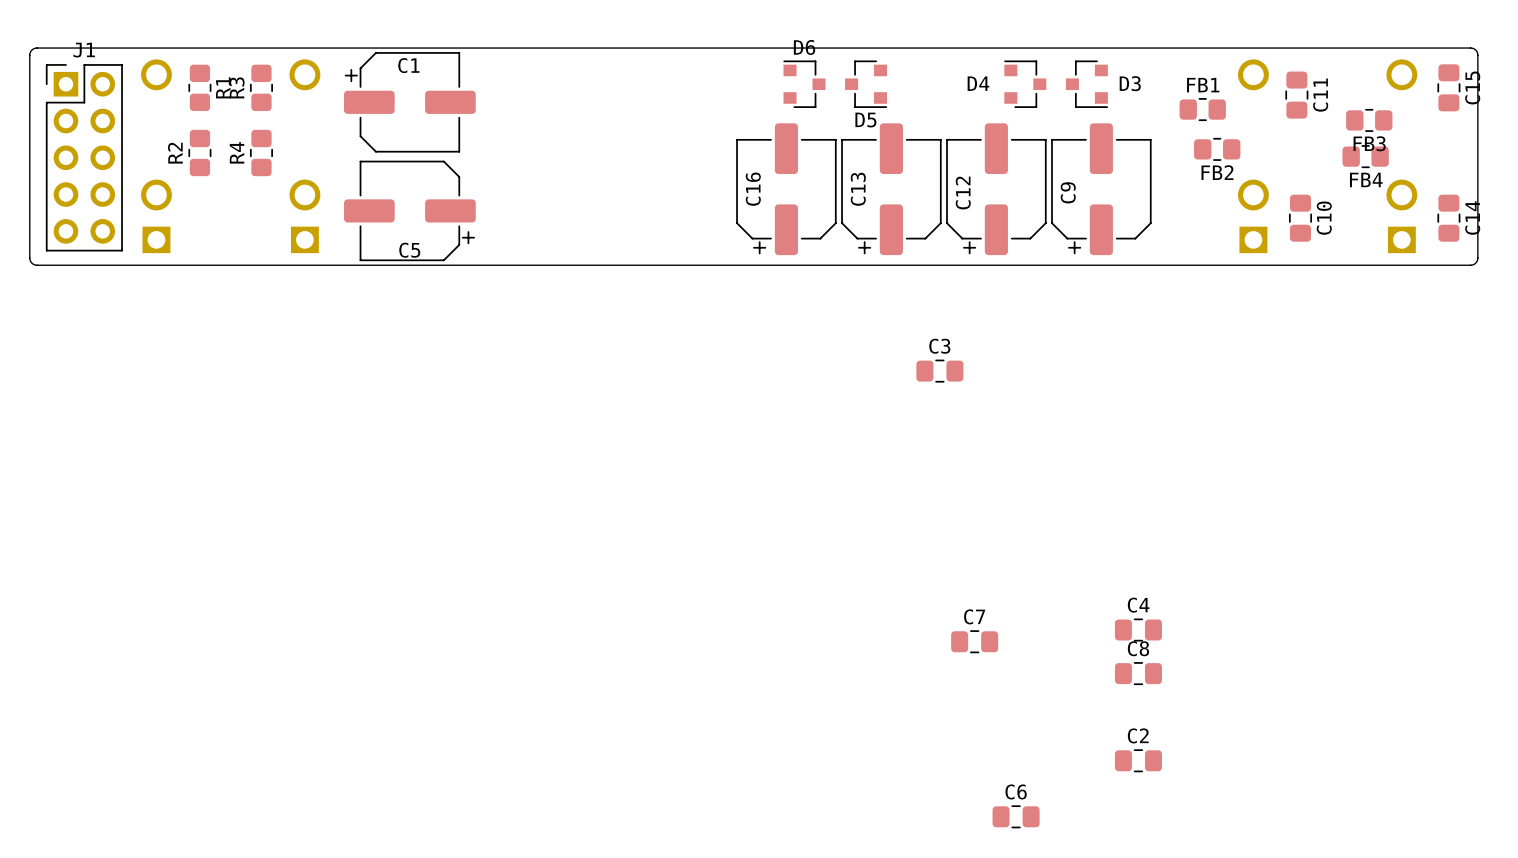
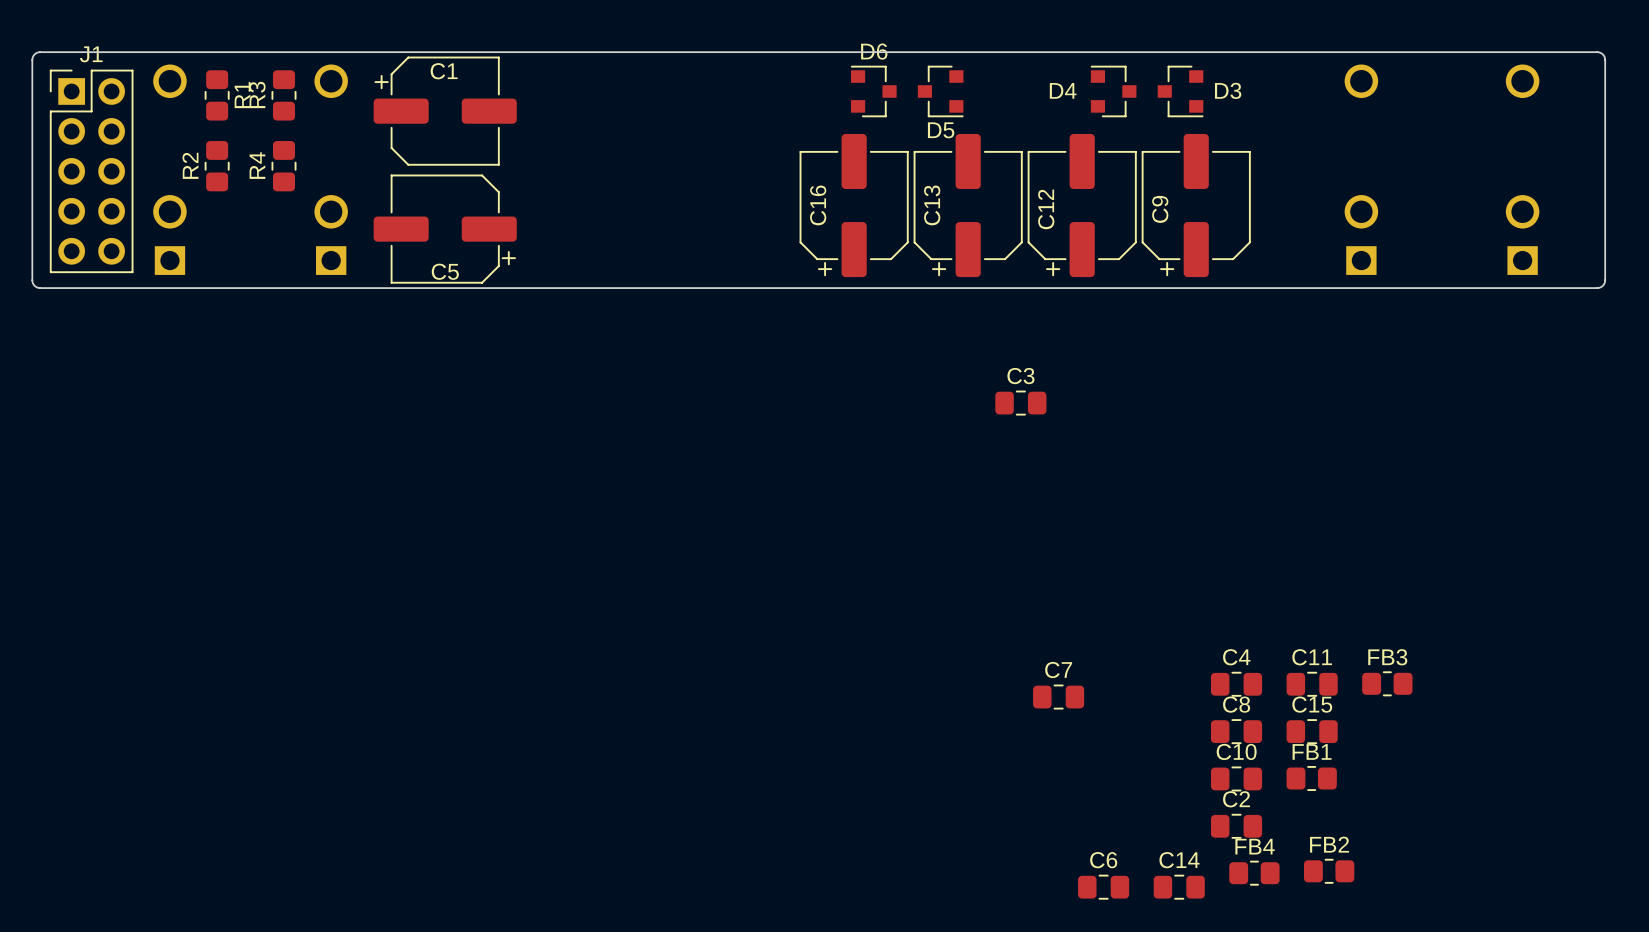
C15 rotation: 0° (1448, 87) -> 90° clockwise (1312, 731)
C15 position: (1448, 87) -> (1312, 731)
C15 name position: C15 (1472, 87) -> C15 (1312, 704)
C11 rotation: 0° (1296, 95) -> 90° clockwise (1312, 684)
C11 position: (1296, 95) -> (1312, 684)
C11 name position: C11 (1320, 95) -> C11 (1312, 657)
FB1 position: (1202, 109) -> (1311, 778)
FB3 position: (1369, 120) -> (1387, 683)
FB3 name position: FB3 (1369, 143) -> FB3 (1387, 657)
FB2 position: (1217, 149) -> (1329, 871)
FB4 position: (1365, 156) -> (1254, 873)
FB2 name position: FB2 (1217, 172) -> FB2 (1329, 844)
FB4 name position: FB4 (1366, 179) -> FB4 (1255, 846)
C14 name position: C14 (1472, 217) -> C14 (1179, 860)
C10 rotation: 0° (1300, 218) -> 90° clockwise (1236, 778)
C10 position: (1300, 218) -> (1236, 778)
C10 name position: C10 (1324, 218) -> C10 (1236, 751)
C14 rotation: 0° (1448, 218) -> 90° clockwise (1179, 887)
C14 position: (1448, 218) -> (1179, 887)

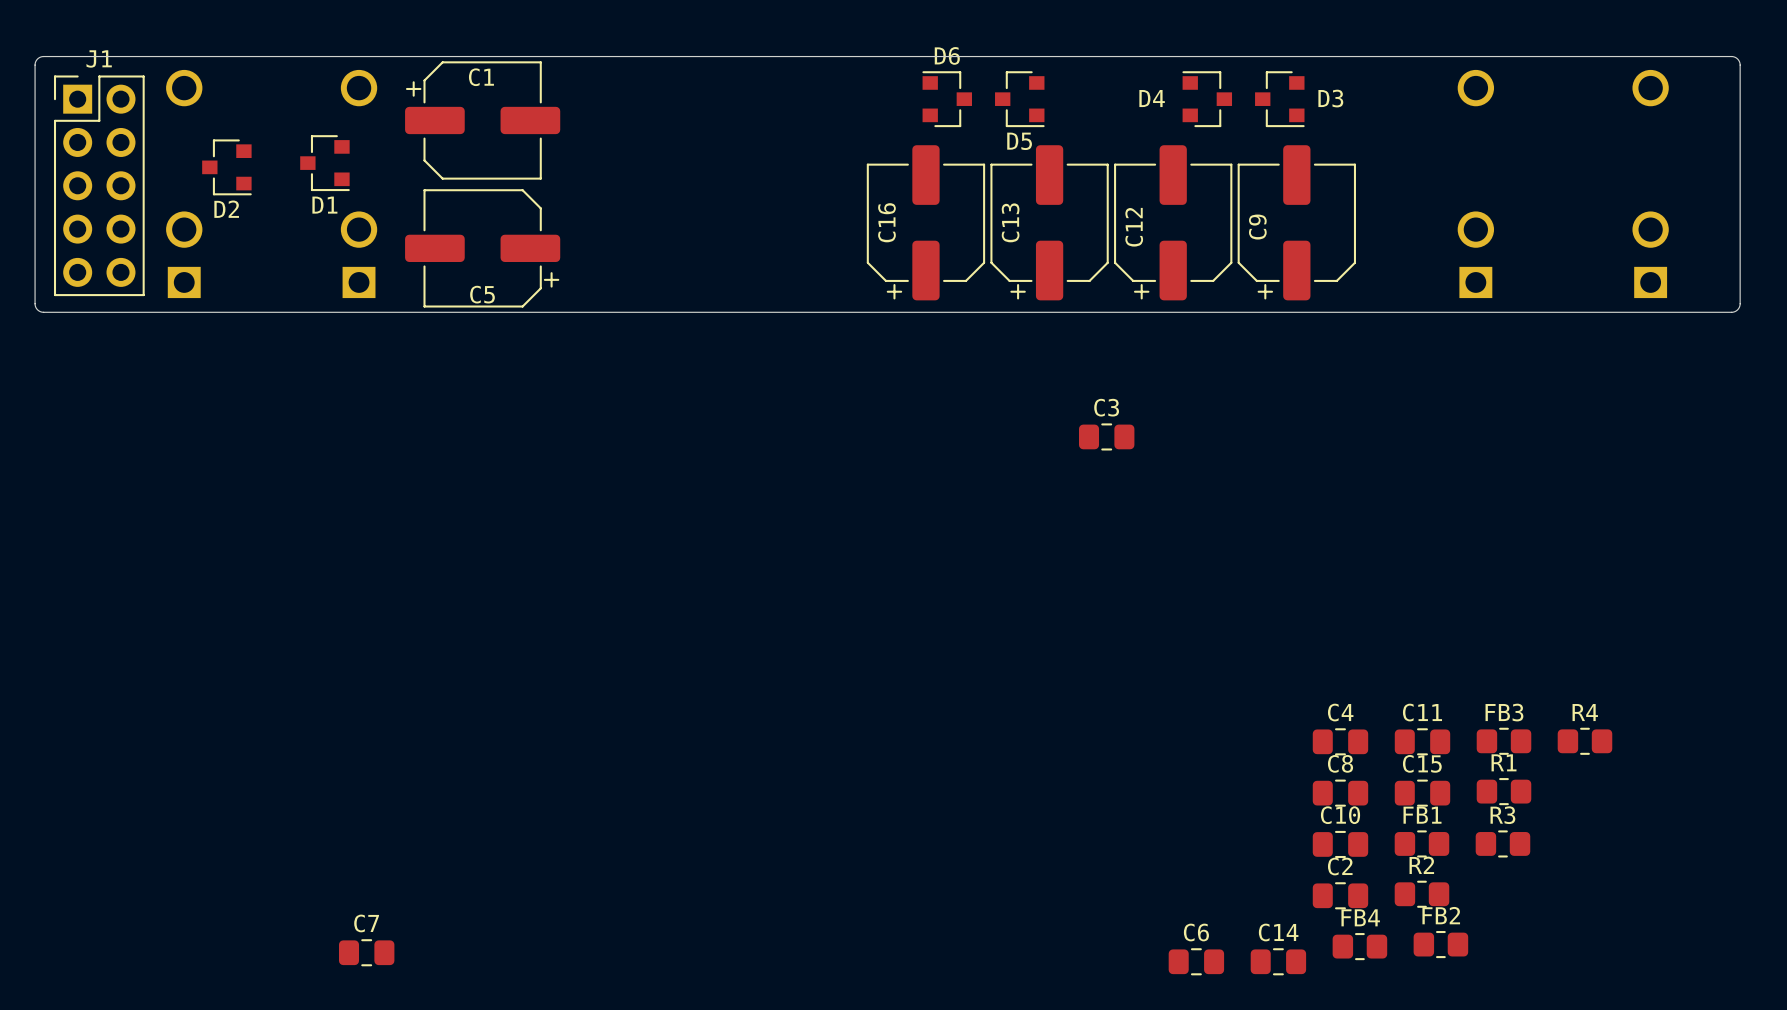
R1 rotation: 0° (217, 95) -> 90° clockwise (1503, 791)
R1 position: (217, 95) -> (1503, 791)
R1 name position: R1 (242, 95) -> R1 (1504, 762)
R3 rotation: 0° (283, 95) -> 90° clockwise (1502, 843)
R3 position: (283, 95) -> (1502, 843)
D1: none -> (325, 163)
D2: none -> (226, 167)
R2 rotation: 0° (217, 166) -> 90° clockwise (1421, 894)
R2 position: (217, 166) -> (1421, 894)
R4 rotation: 0° (283, 166) -> 90° clockwise (1584, 741)
R4 position: (283, 166) -> (1584, 741)
C7 position: (1058, 697) -> (366, 952)

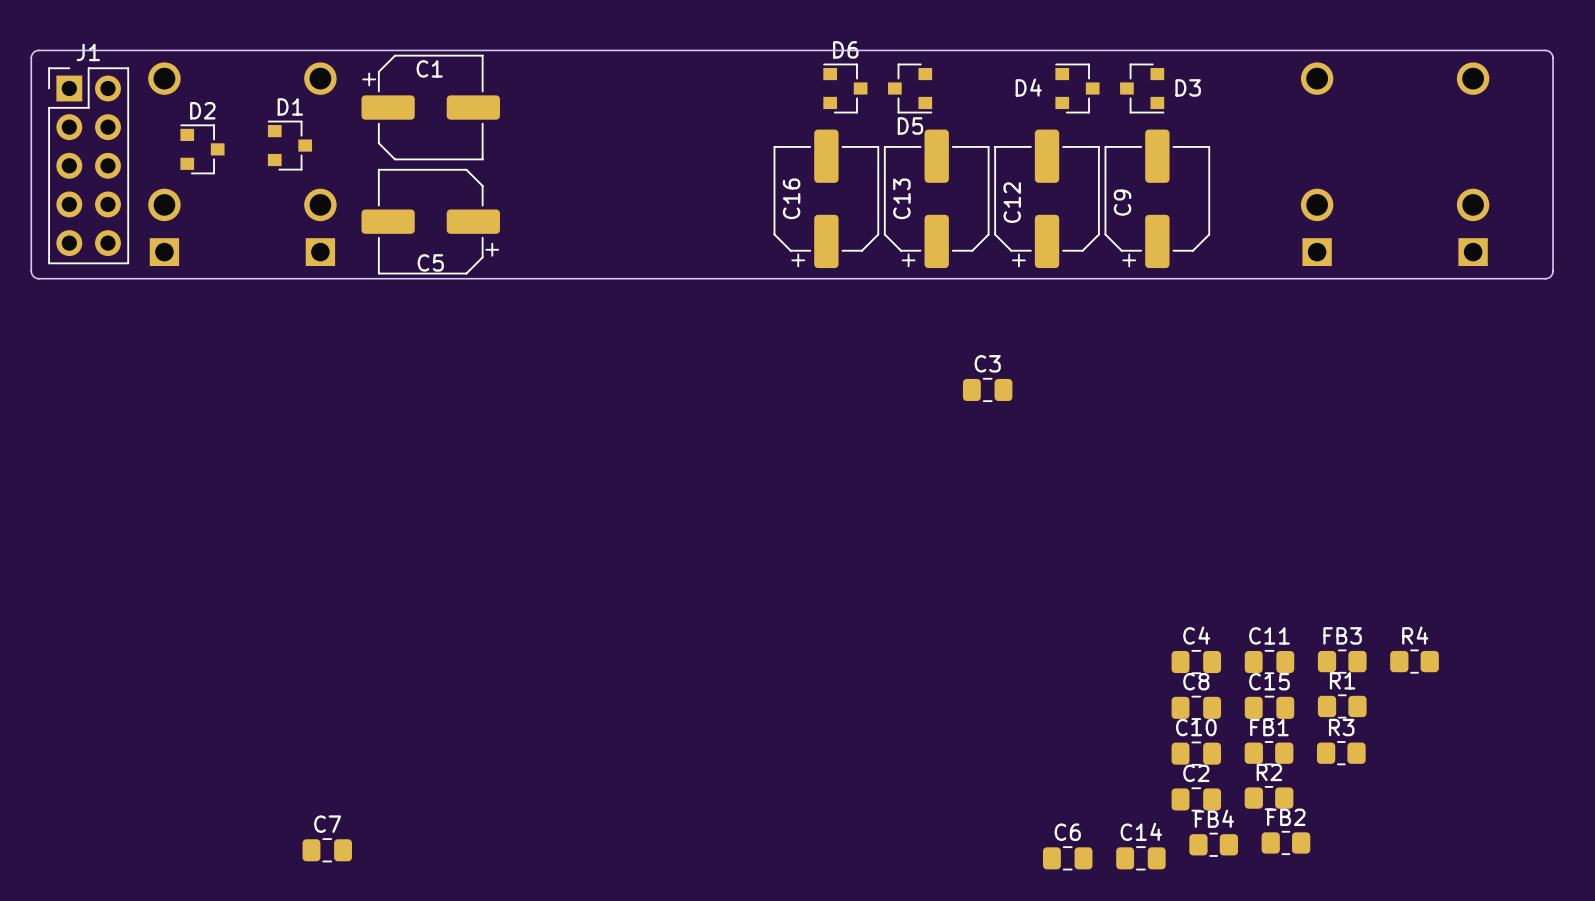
D1 rotation: 0° (325, 163) -> 180° (289, 145)
D2 rotation: 0° (226, 167) -> 180° (202, 149)

